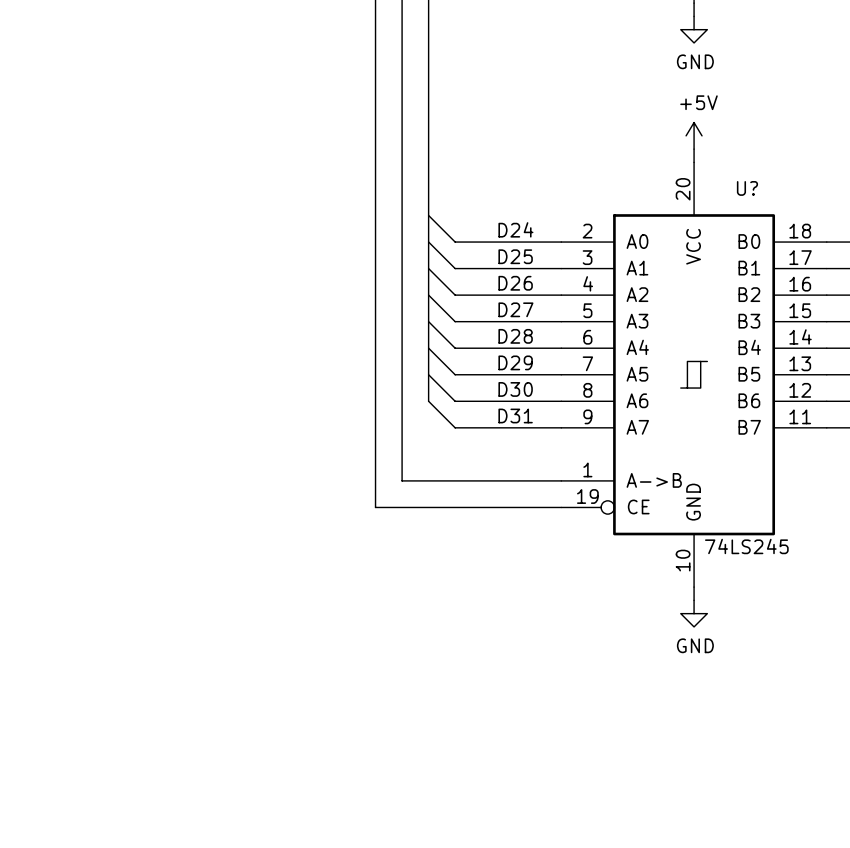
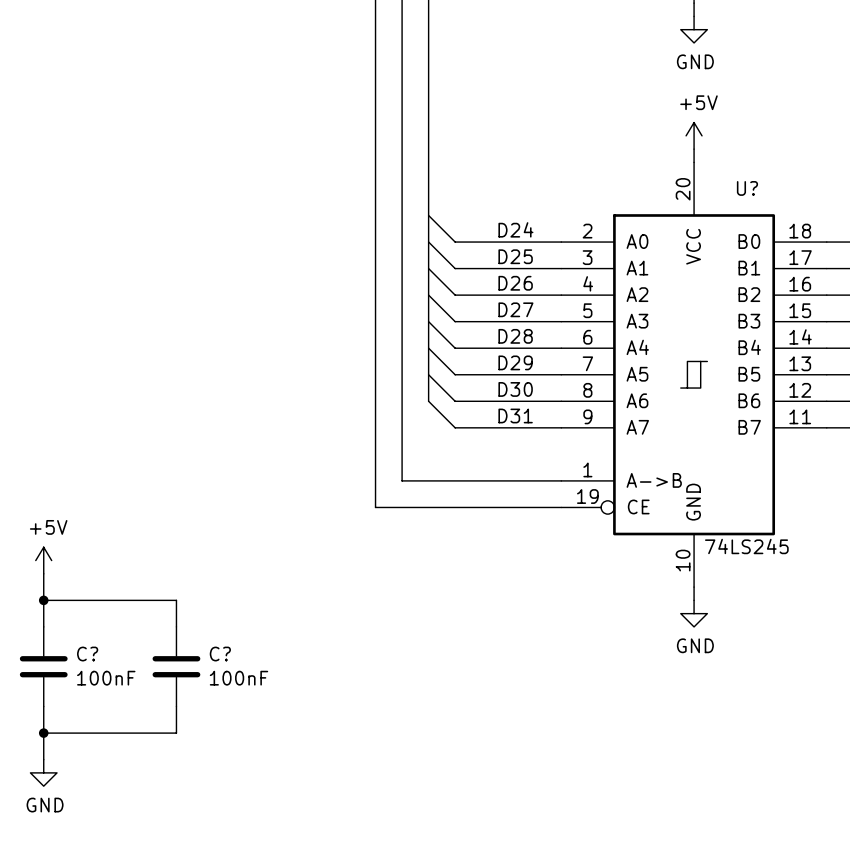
power symbol: none -> +5V (43, 560)
wire: none -> (43, 573) (43, 626)
wire: none -> (43, 600) (176, 600) (176, 626)
junction: none -> (43, 600)
C?: none -> 100nF (43, 666)
C?: none -> 100nF (176, 666)
wire: none -> (43, 706) (43, 759)
wire: none -> (176, 706) (176, 733) (43, 733)
junction: none -> (43, 733)
power symbol: none -> GND (43, 772)

